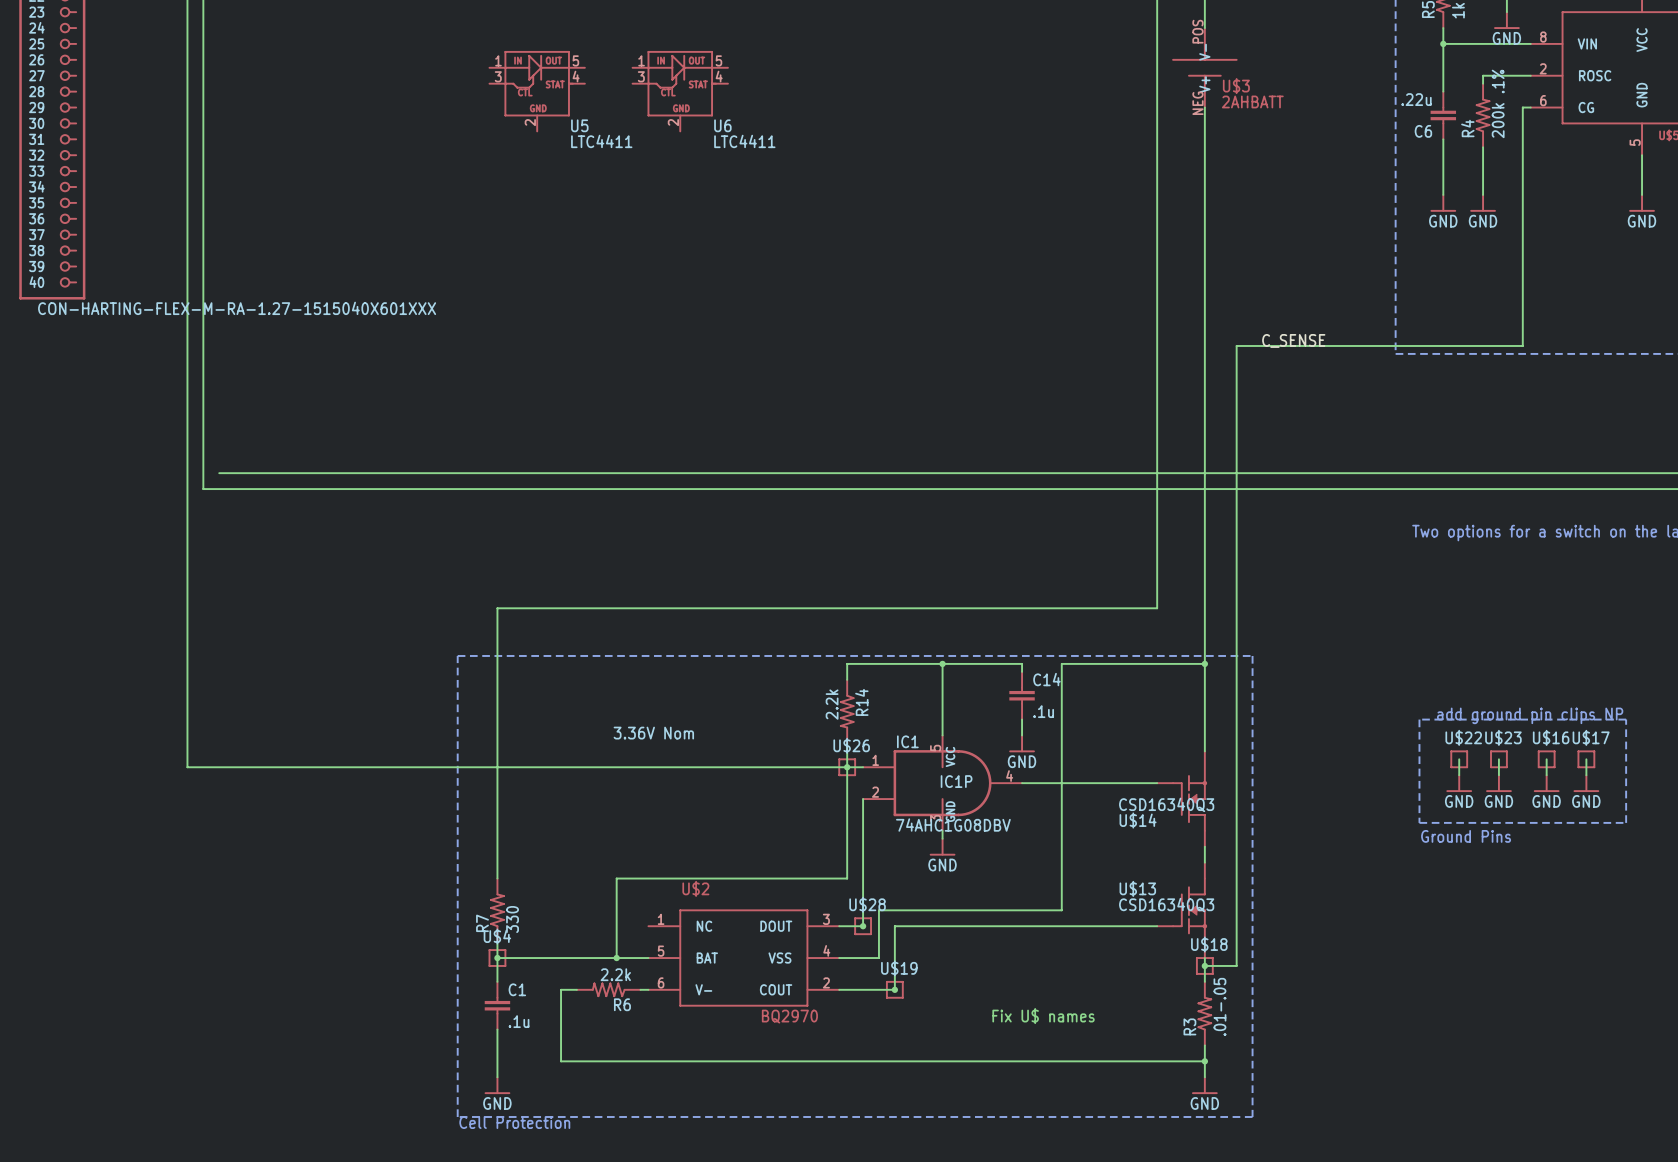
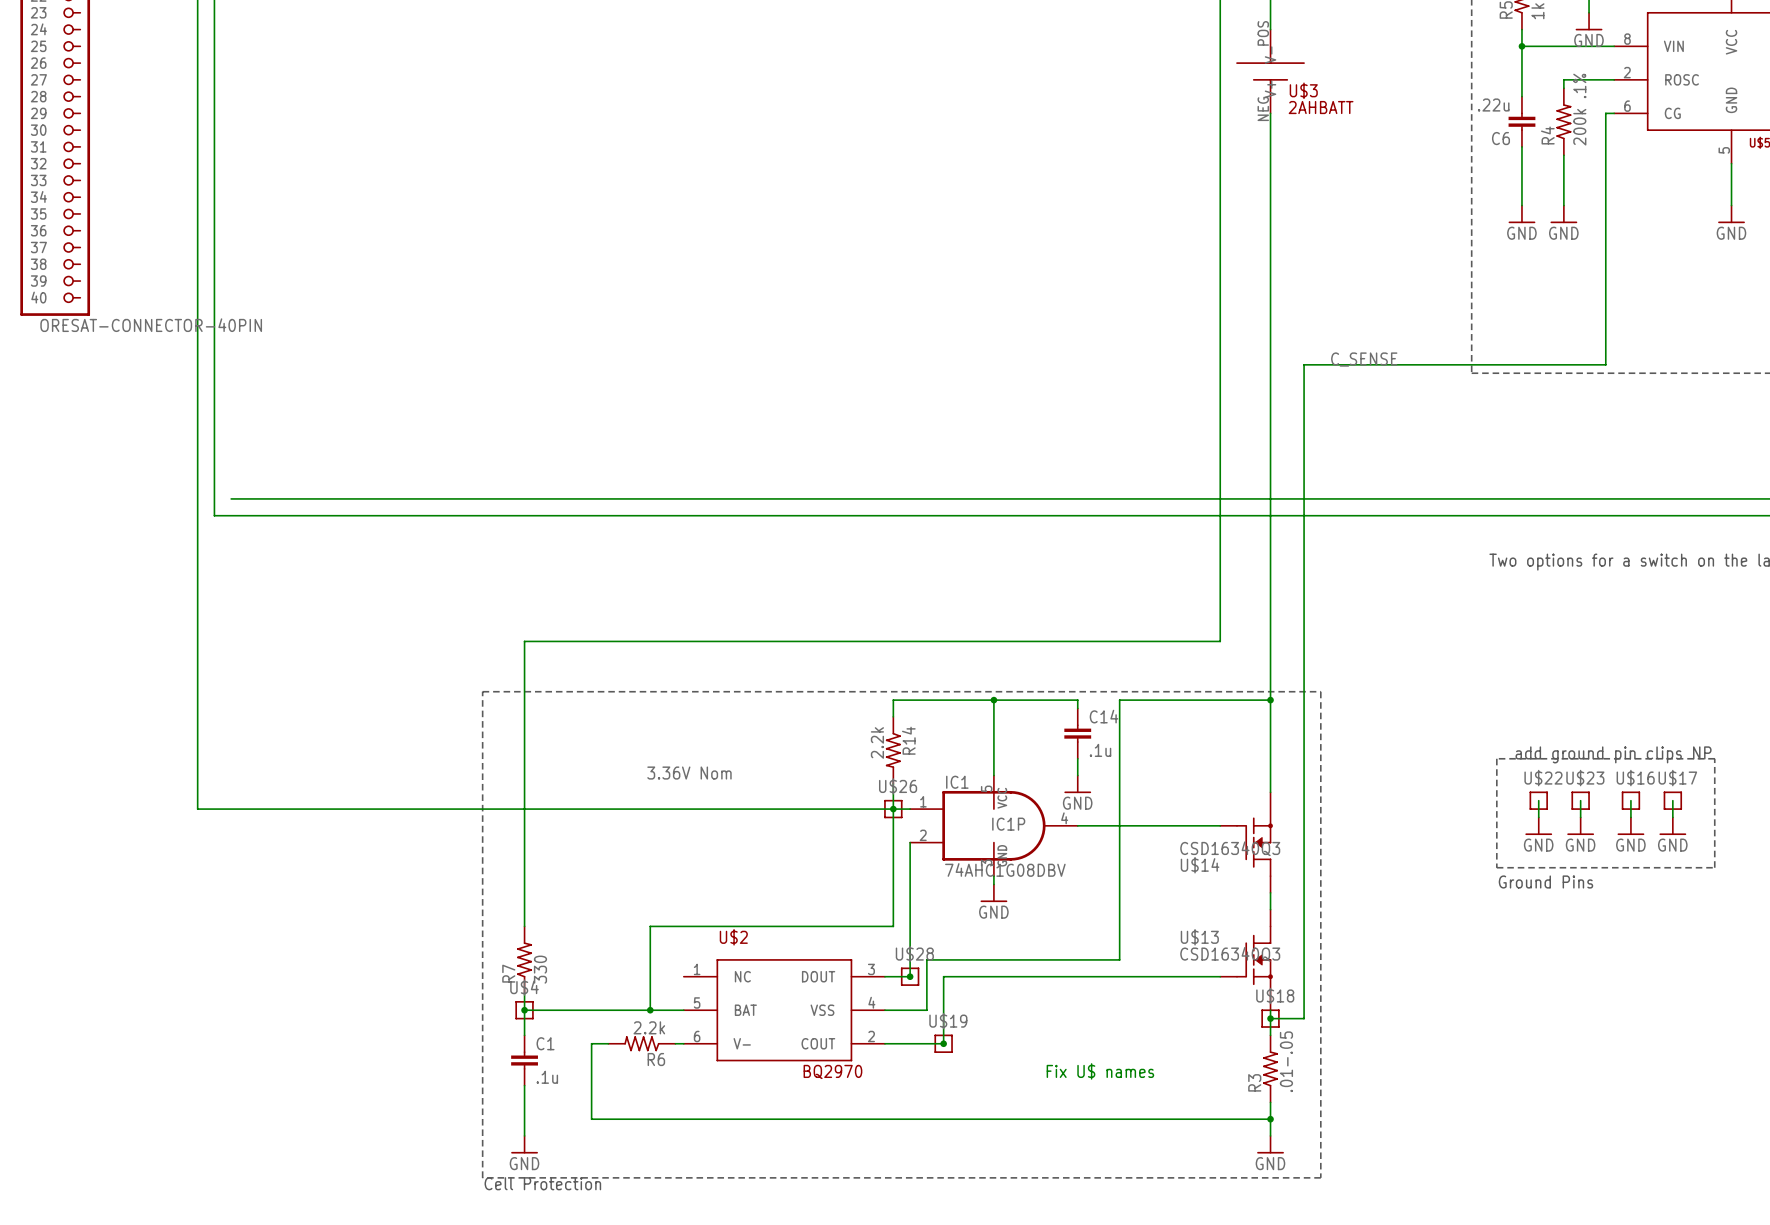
U5: LTC4411 (537, 91) -> none
U6: LTC4411 (680, 91) -> none
part value: CON-HARTING-FLEX-M-RA-1.27-1515040X601XXX (237, 308) -> ORESAT-CONNECTOR-40PIN (151, 325)

